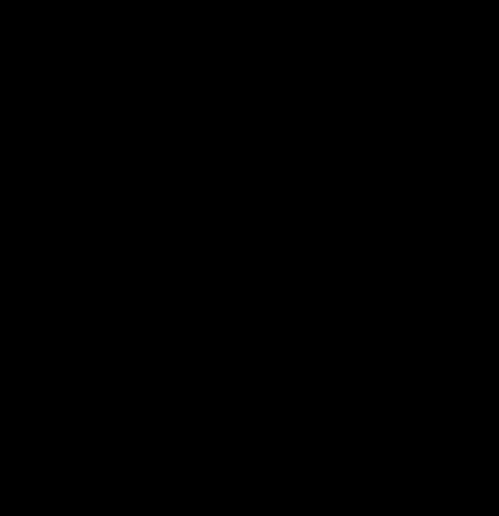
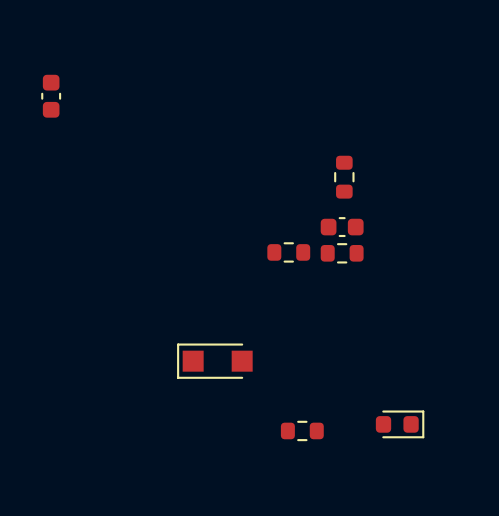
part: none -> (51, 96)
part: none -> (344, 177)
part: none -> (342, 227)
part: none -> (288, 252)
part: none -> (342, 253)
part: none -> (214, 361)
part: none -> (400, 424)
part: none -> (302, 430)

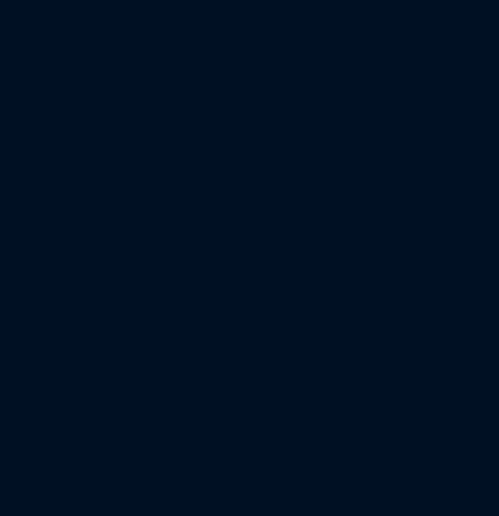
part: (51, 96) -> none
part: (344, 177) -> none
part: (342, 227) -> none
part: (288, 252) -> none
part: (342, 253) -> none
part: (214, 361) -> none
part: (400, 424) -> none
part: (302, 430) -> none

